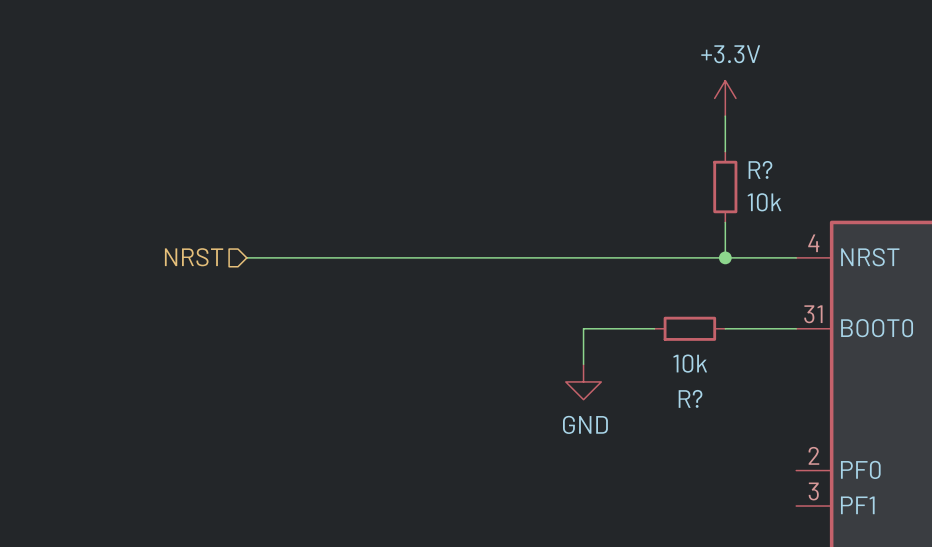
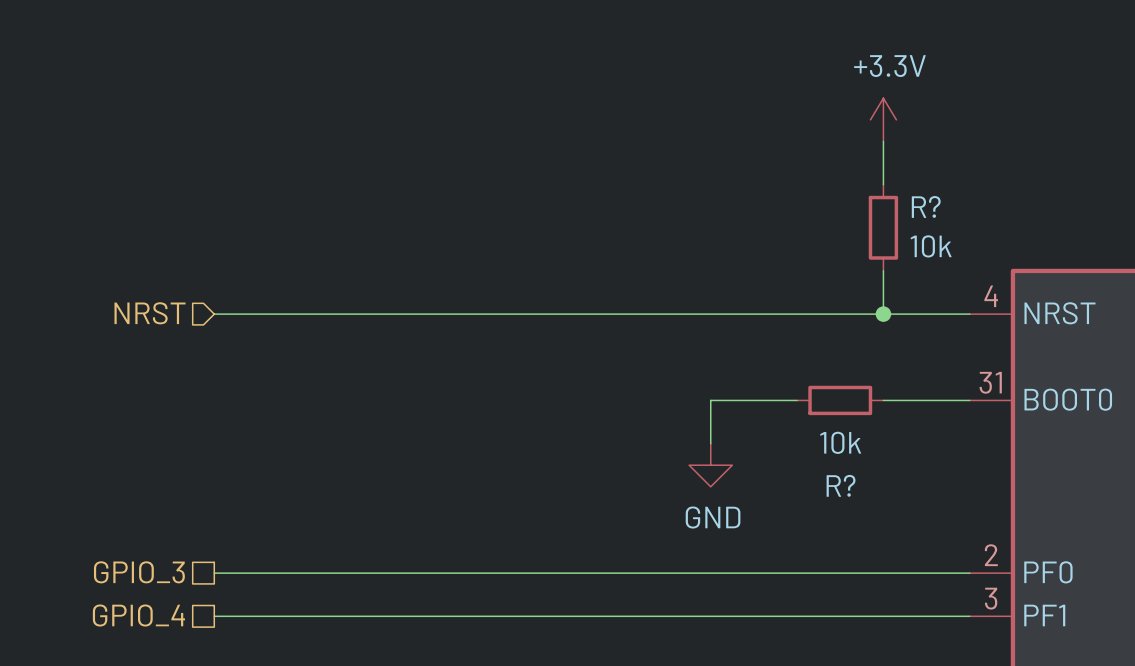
wire: none -> (214, 314) (300, 314)
hierarchical label position: NRST (194, 257) -> NRST (150, 313)
hierarchical label: none -> GPIO_3 (139, 572)
wire: none -> (214, 573) (969, 573)
hierarchical label: none -> GPIO_4 (138, 615)
wire: none -> (214, 616) (969, 616)

